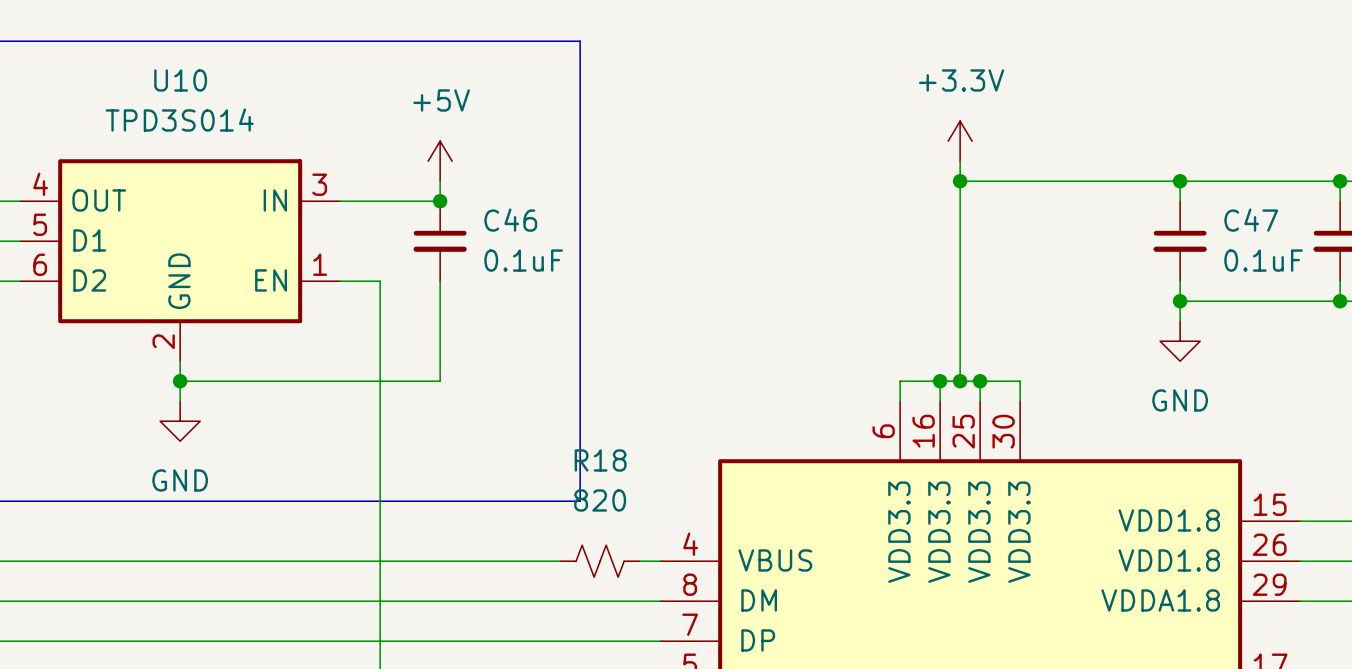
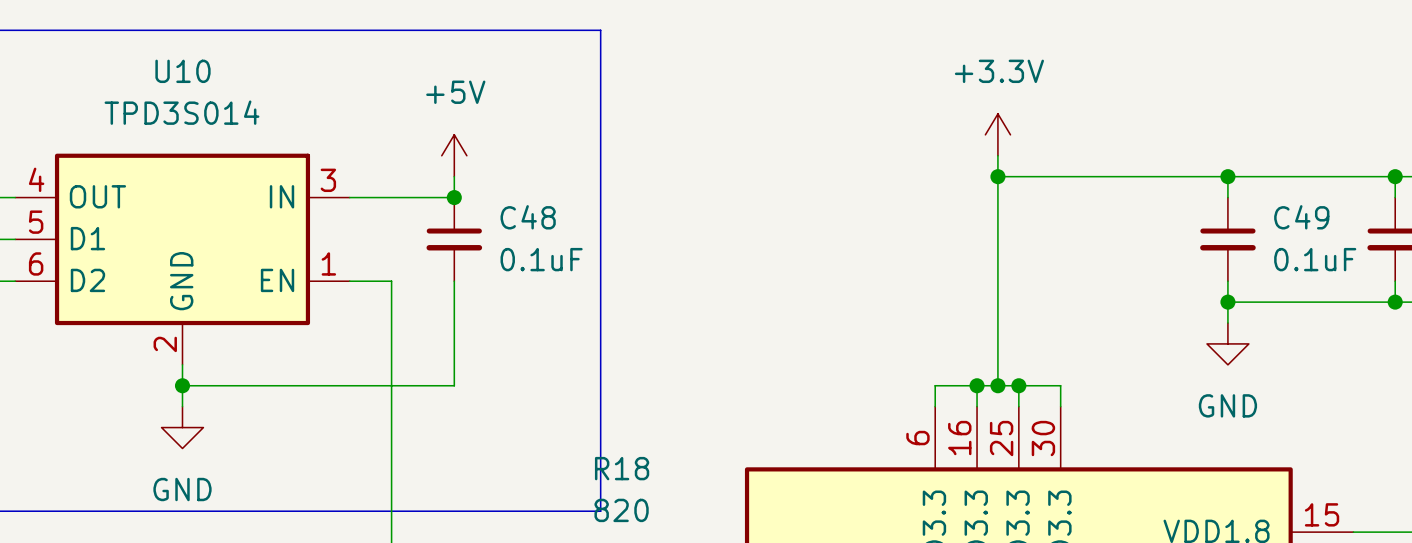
C46 name: C46 (510, 220) -> C48 (528, 217)
C47 name: C47 (1251, 220) -> C49 (1301, 217)

